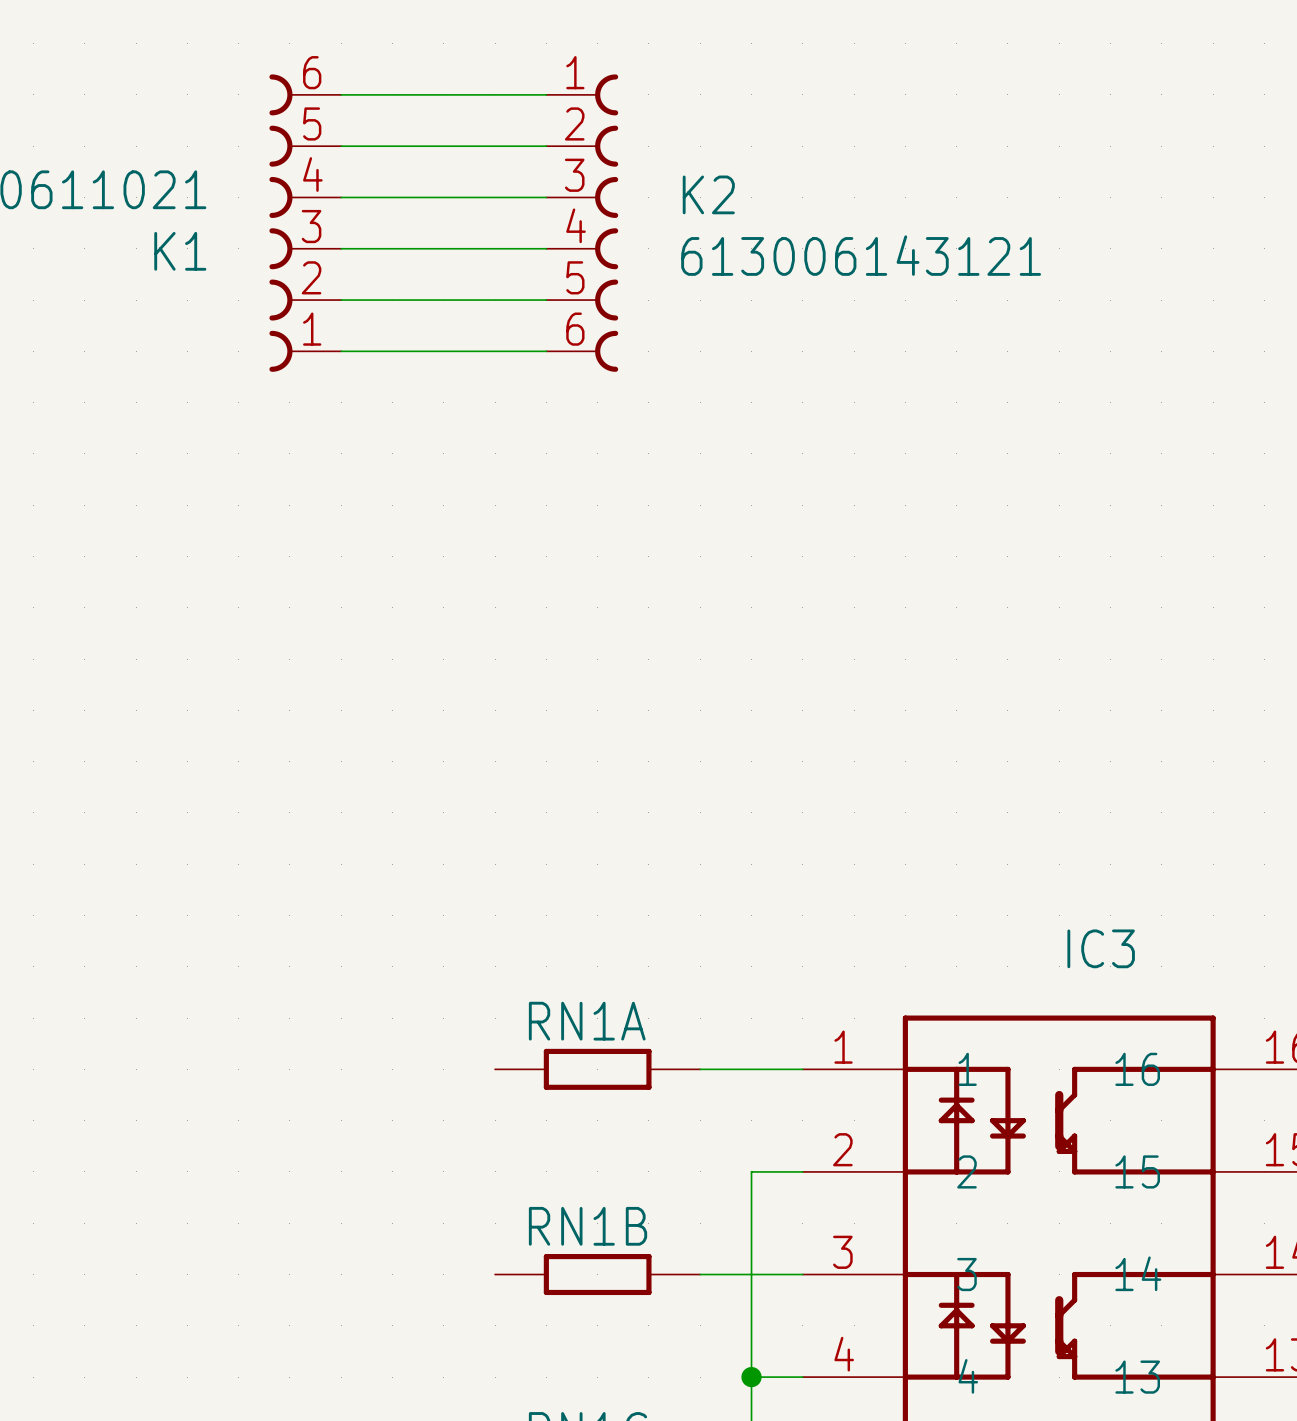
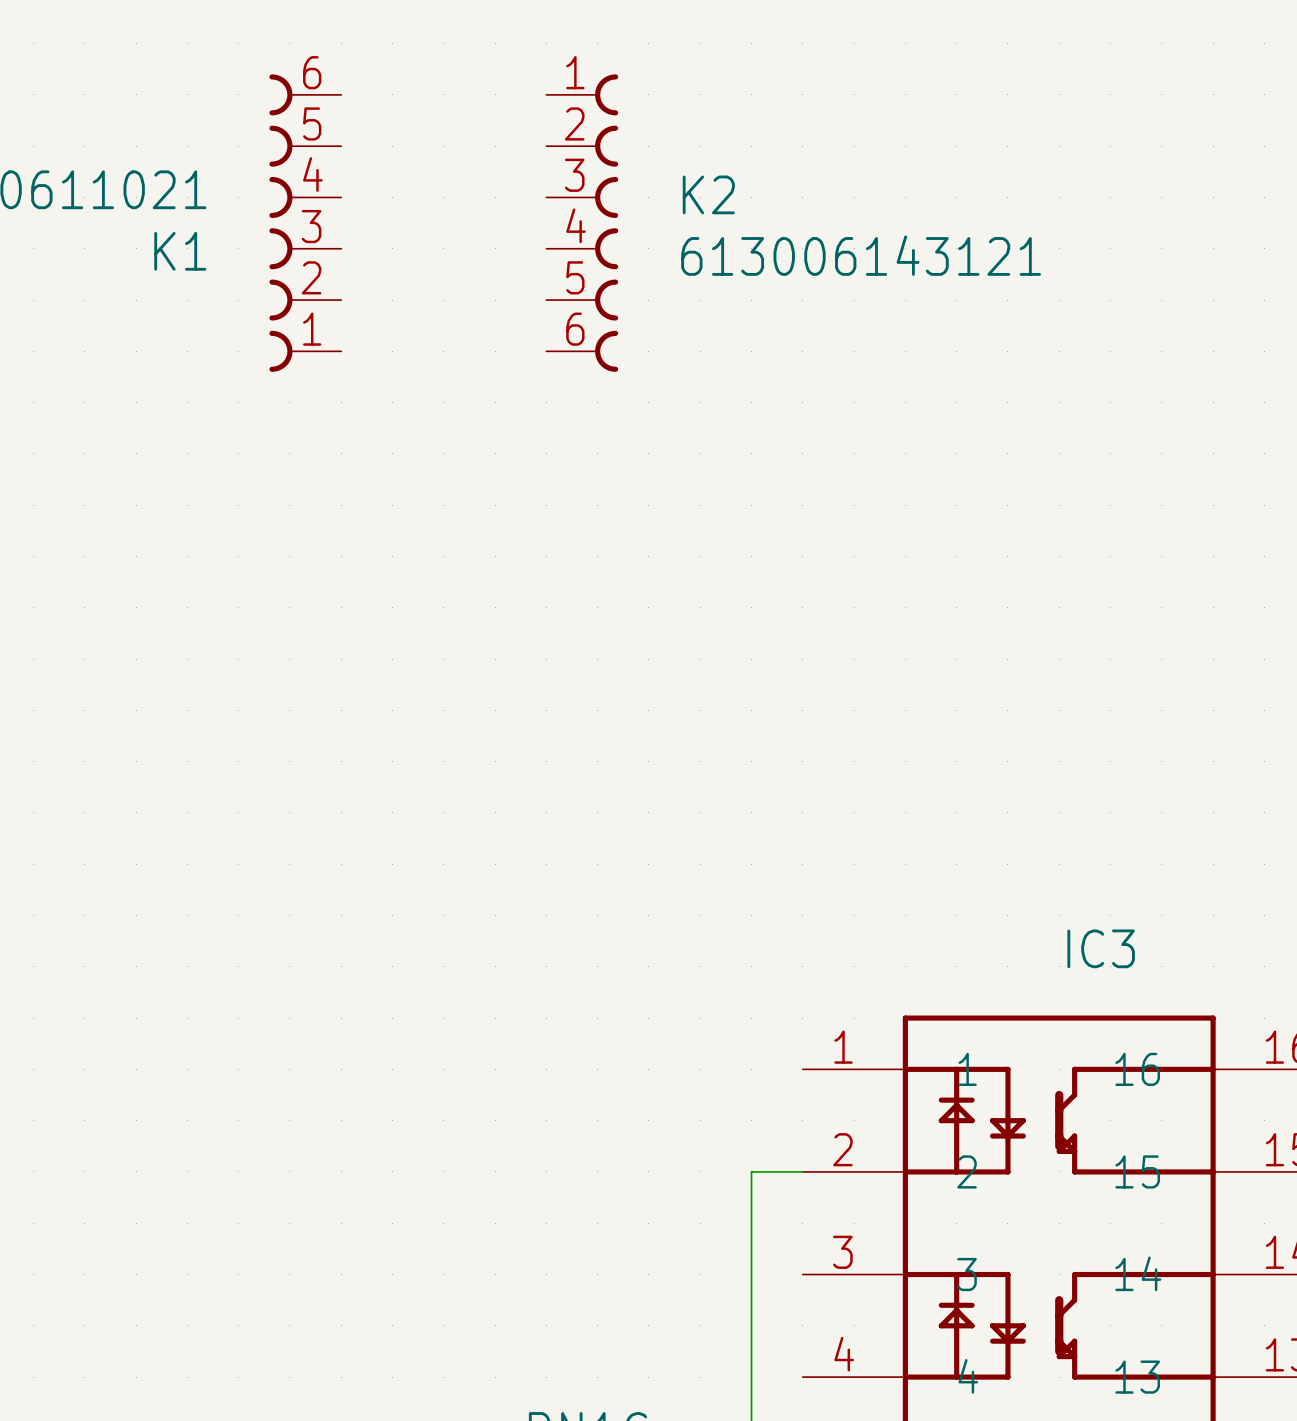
wire: (341, 94) (546, 94) -> none
wire: (341, 146) (546, 146) -> none
wire: (341, 197) (546, 197) -> none
wire: (341, 248) (546, 248) -> none
wire: (341, 300) (546, 300) -> none
wire: (341, 351) (546, 351) -> none
RN1A: (597, 1069) -> none
wire: (700, 1069) (802, 1069) -> none
RN1B: (597, 1274) -> none
wire: (700, 1274) (802, 1274) -> none
wire: (751, 1377) (802, 1377) -> none
junction: (751, 1377) -> none

